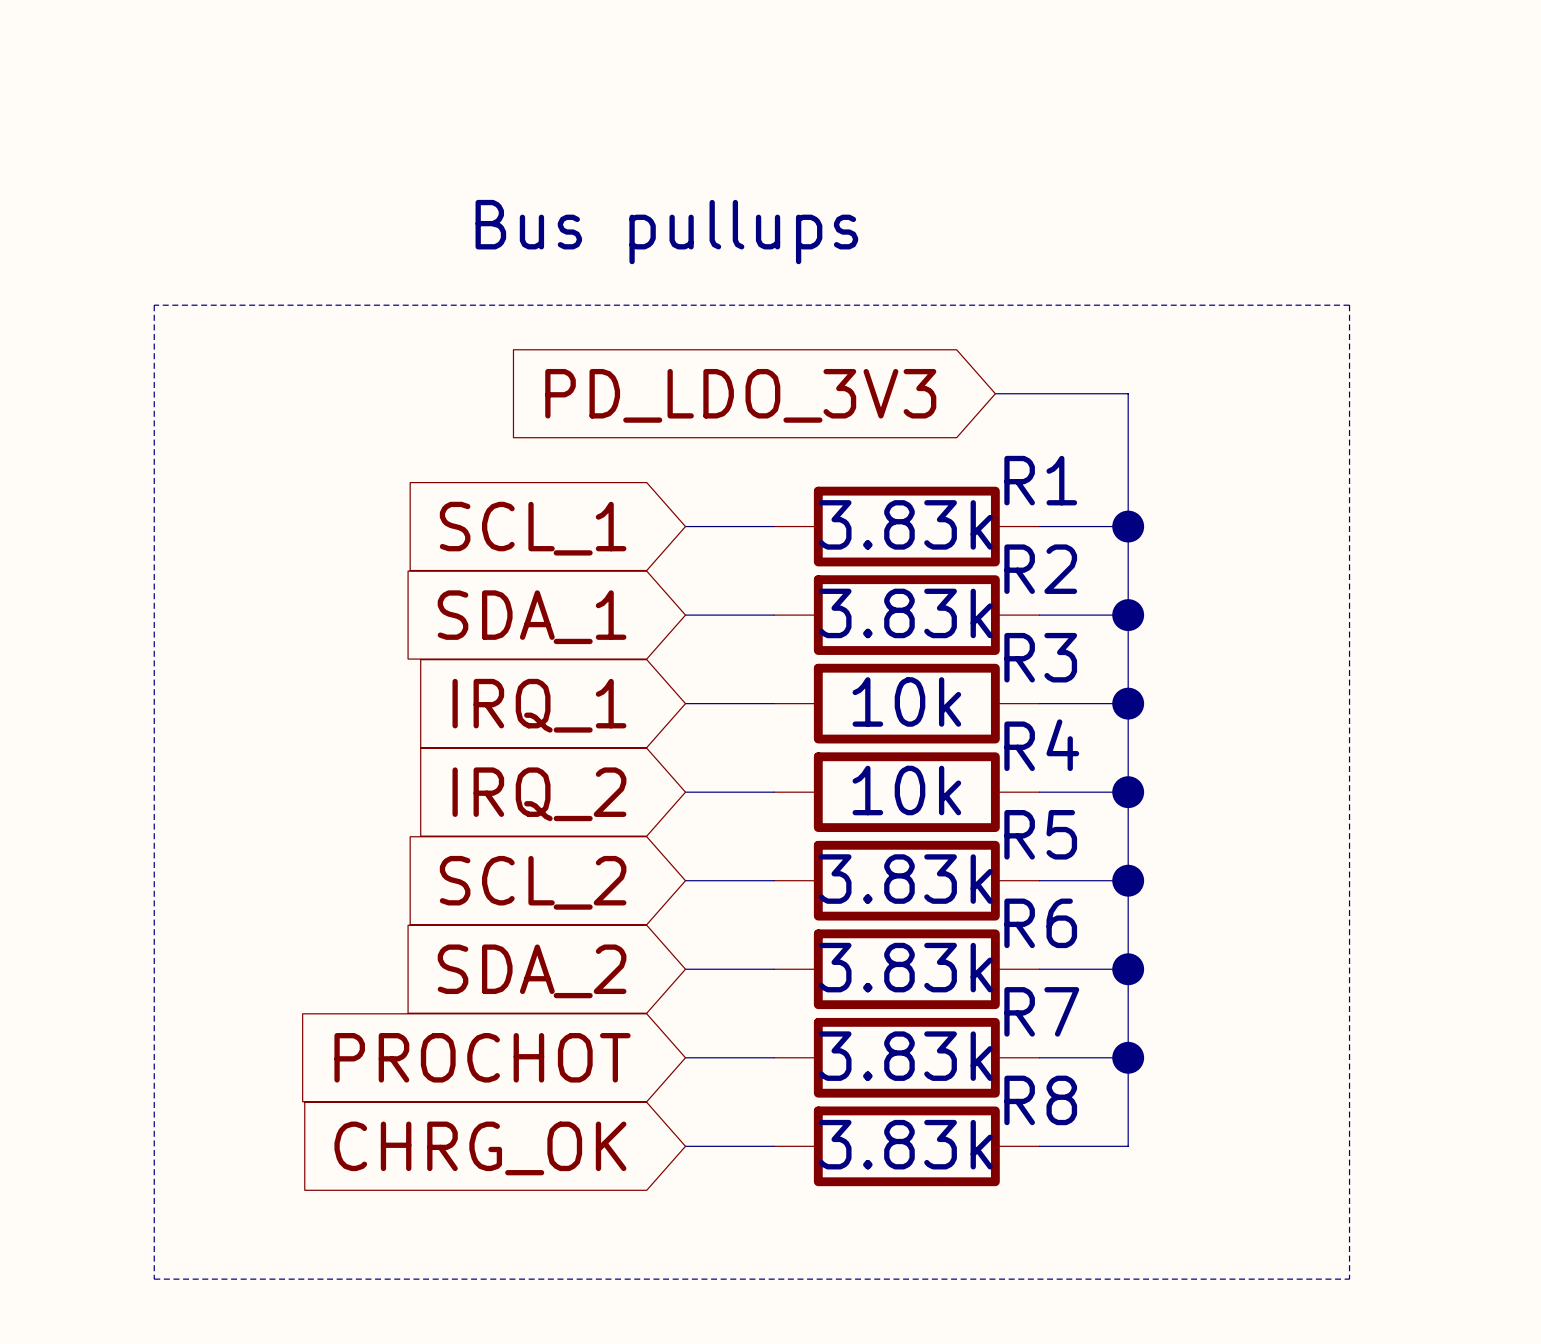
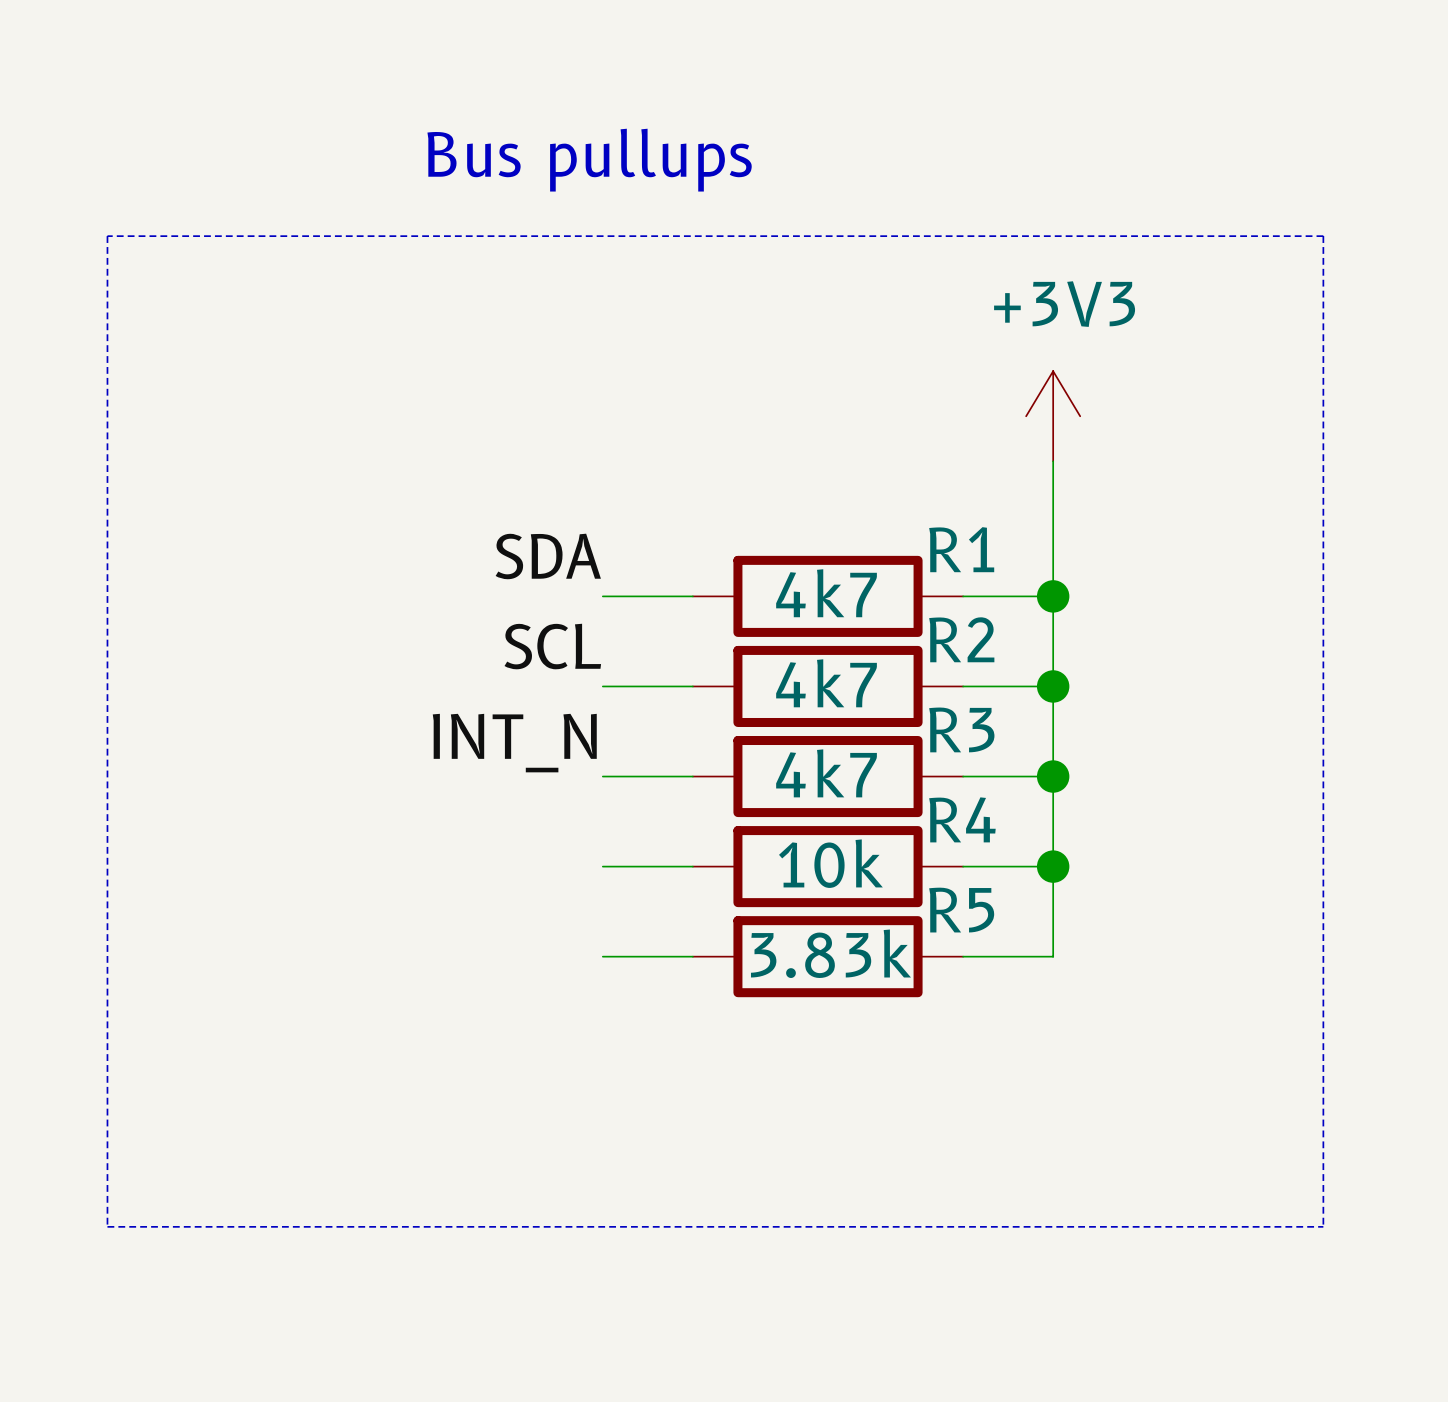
text position: Bus pullups (666, 232) -> Bus pullups (589, 160)
line: (154, 305) (1349, 305) (1349, 1279) (154, 1279) (154, 305) -> (107, 236) (1323, 236) (1323, 1226) (107, 1226) (107, 236)
power symbol: none -> +3V3 (1053, 416)
wire: (995, 393) (1128, 393) -> none
global label: PD_LDO_3V3 (740, 395) -> none
label: none -> SDA (548, 556)
R1 value: 3.83k (905, 524) -> 4k7 (826, 593)
global label: SCL_1 (533, 528) -> none
label: none -> SCL (552, 646)
R2 value: 3.83k (905, 613) -> 4k7 (826, 683)
global label: SDA_1 (532, 617) -> none
label: none -> INT_N (514, 743)
R3 value: 10k (906, 701) -> 4k7 (826, 773)
global label: IRQ_1 (539, 705) -> none
global label: IRQ_2 (539, 794) -> none
wire: (1128, 880) (1128, 1146) (1039, 1146) -> none
junction: (1128, 880) -> none
global label: SCL_2 (533, 882) -> none
wire: (685, 969) (774, 969) -> none
R6: 3.83k (906, 969) -> none
wire: (1039, 969) (1128, 969) -> none
junction: (1128, 969) -> none
global label: SDA_2 (532, 971) -> none
global label: PROCHOT (482, 1057) -> none
wire: (685, 1057) (774, 1057) -> none
R7: 3.83k (906, 1057) -> none
wire: (1039, 1057) (1128, 1057) -> none
junction: (1128, 1057) -> none
R8: 3.83k (906, 1146) -> none
global label: CHRG_OK (480, 1148) -> none

